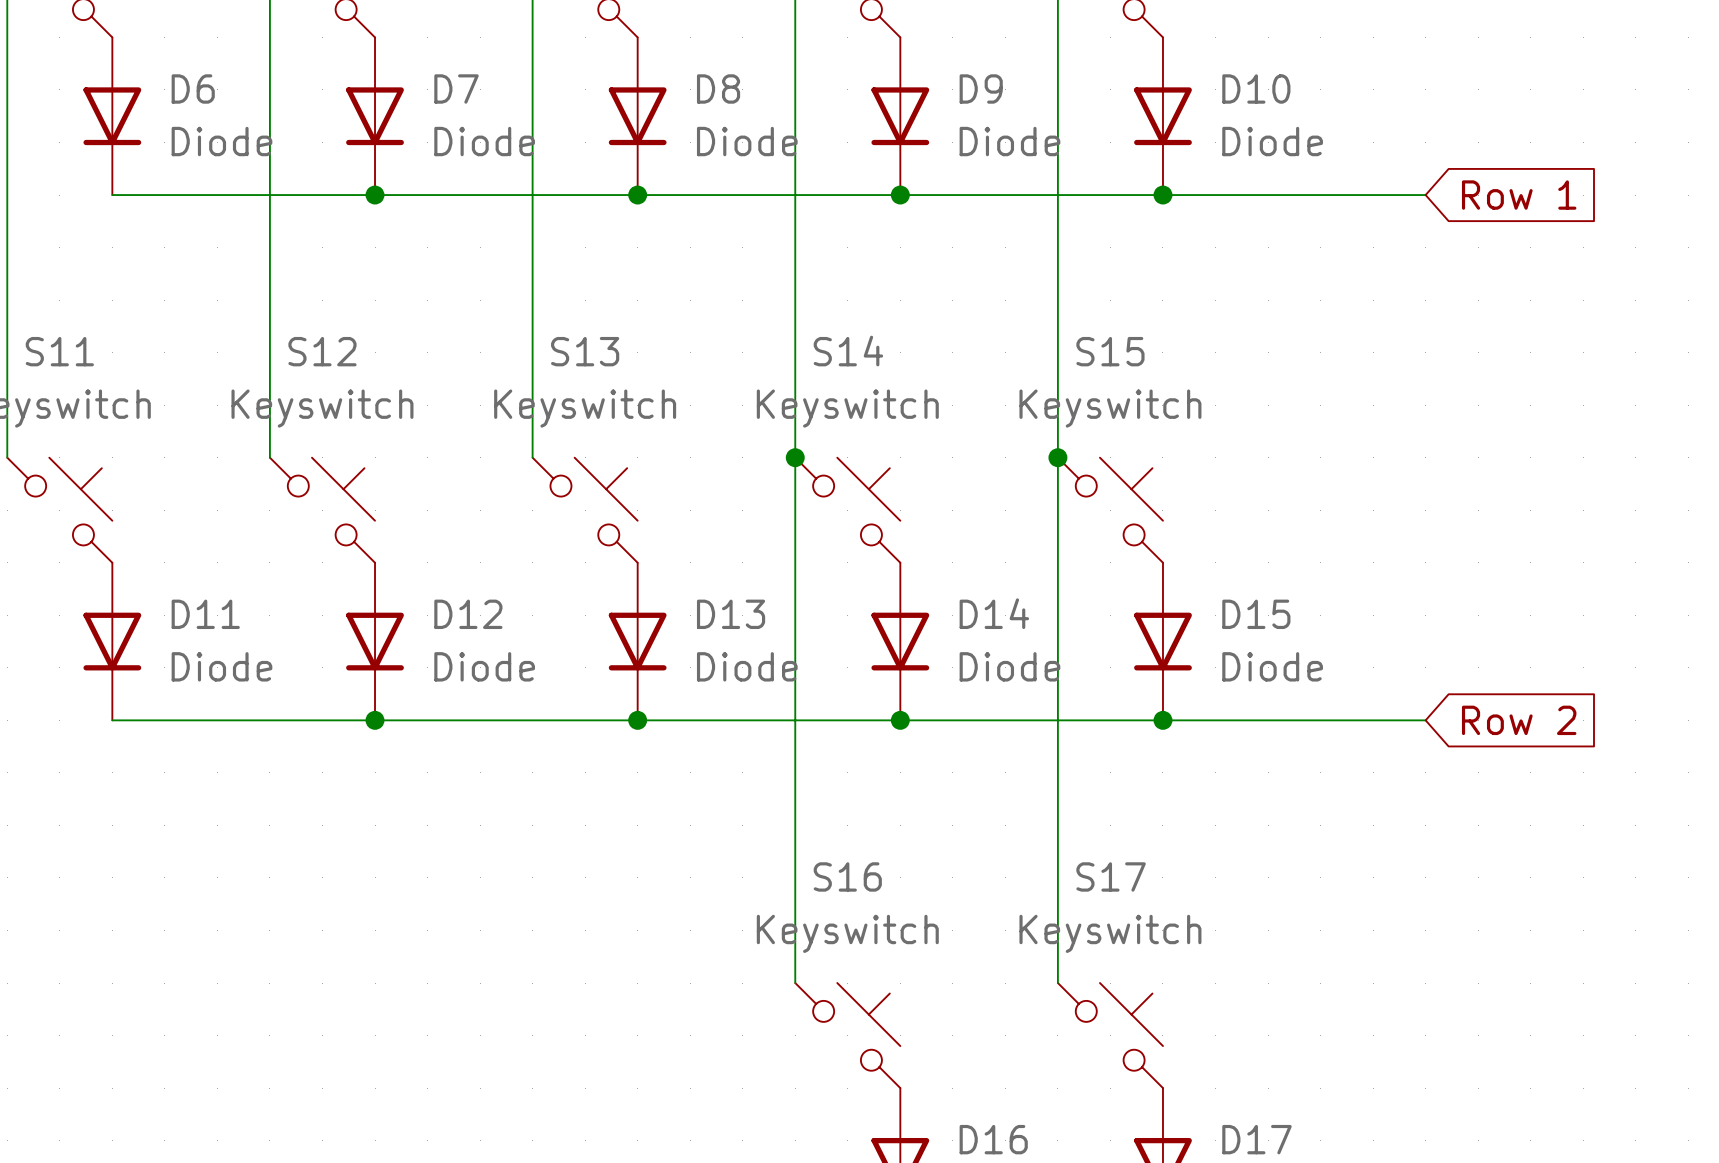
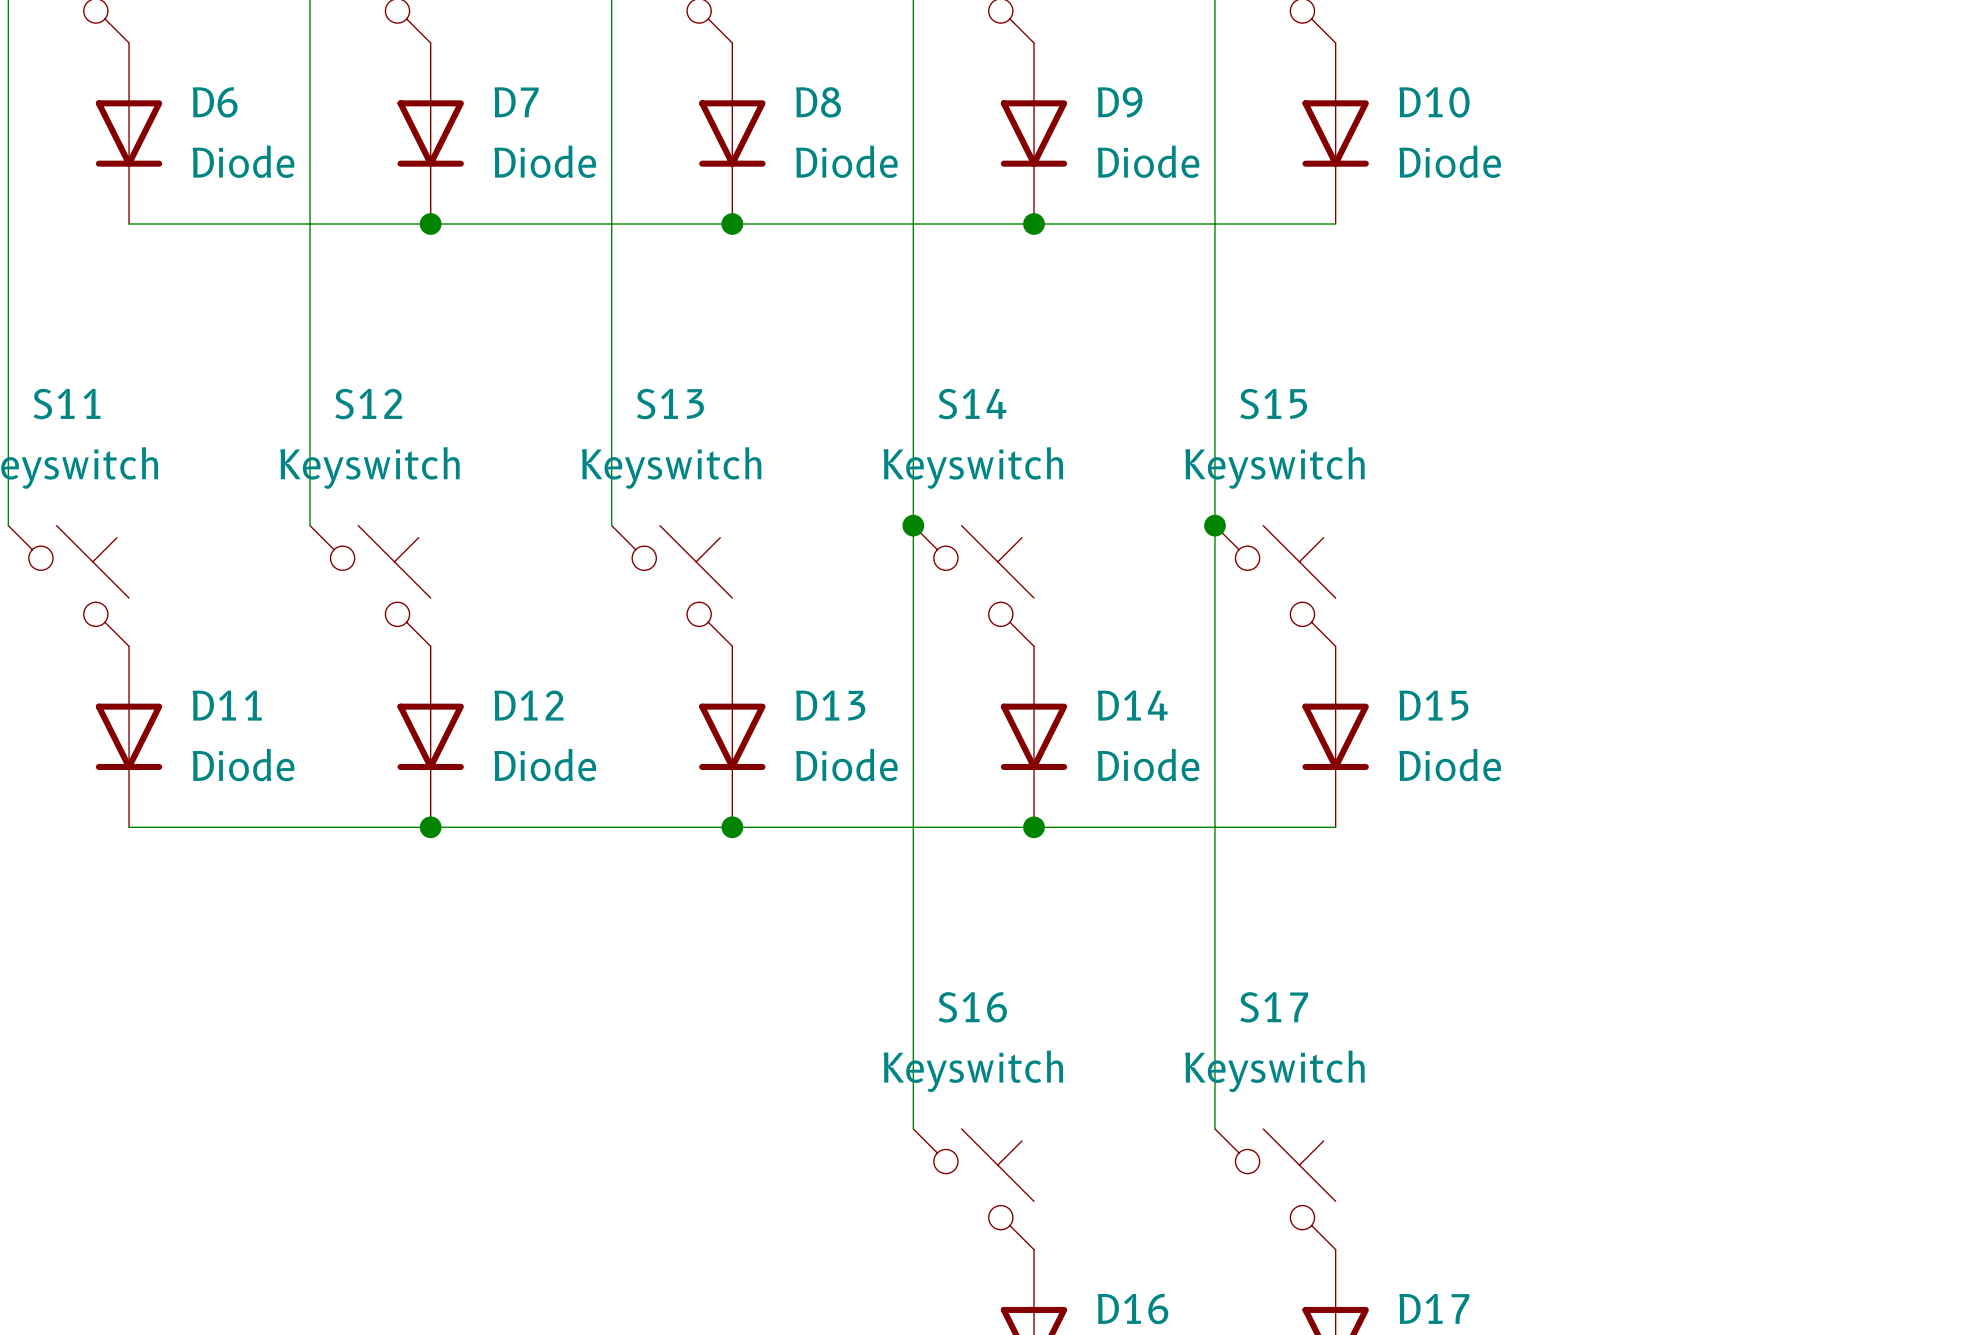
wire: (1162, 195) (1425, 195) -> none
junction: (1162, 195) -> none
global label: Row 1 (1519, 195) -> none
wire: (1162, 720) (1425, 720) -> none
junction: (1162, 720) -> none
global label: Row 2 (1519, 720) -> none

